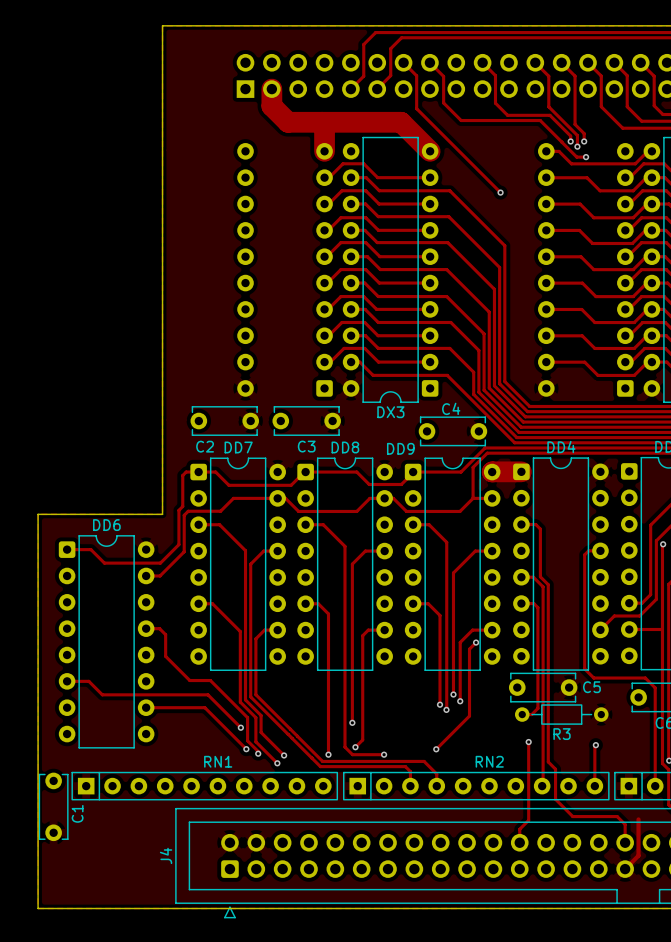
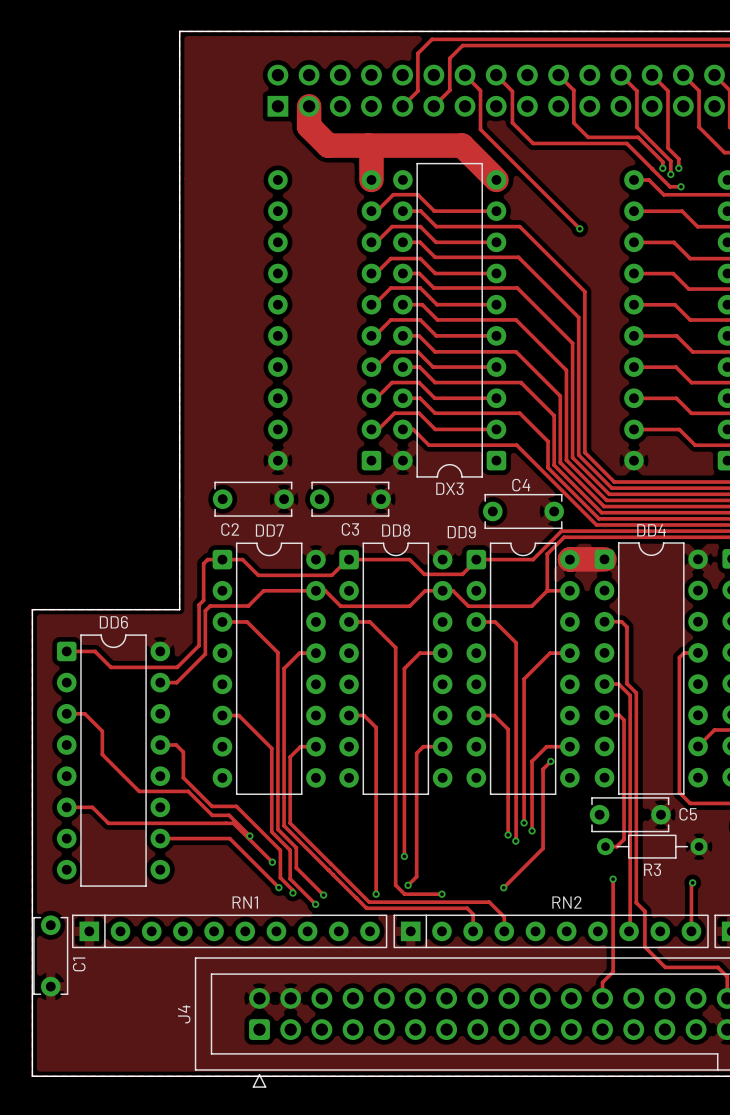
track: none -> (66, 713) (84, 713) (102, 731) (102, 754) (139, 791) (188, 791) (212, 815) (229, 815) (249, 836)
via: none -> (249, 836)

